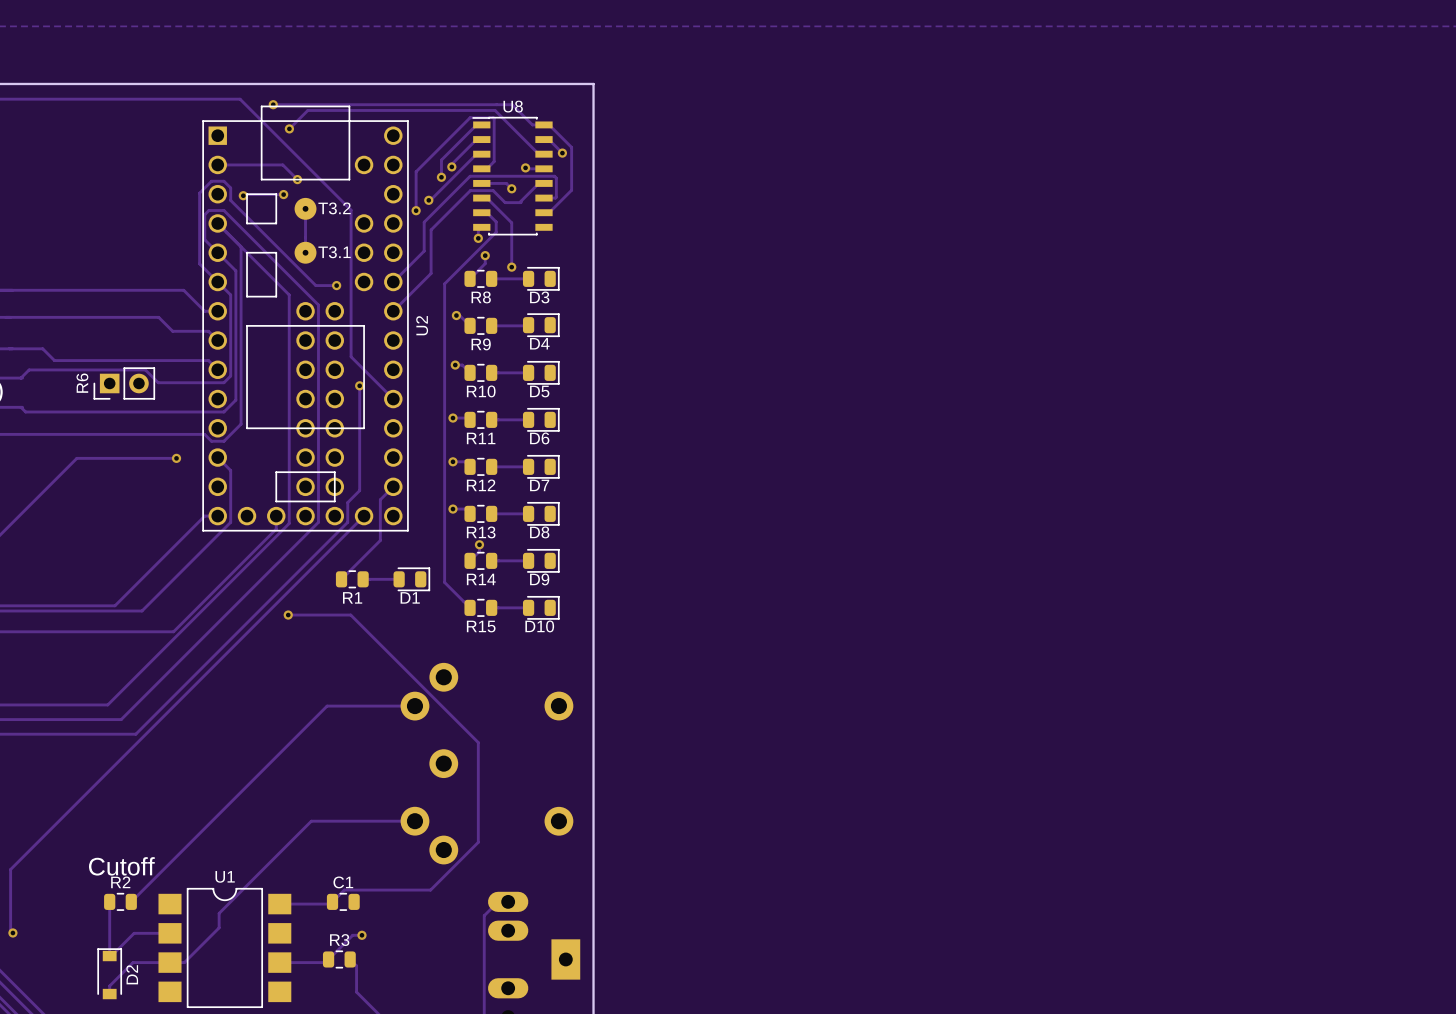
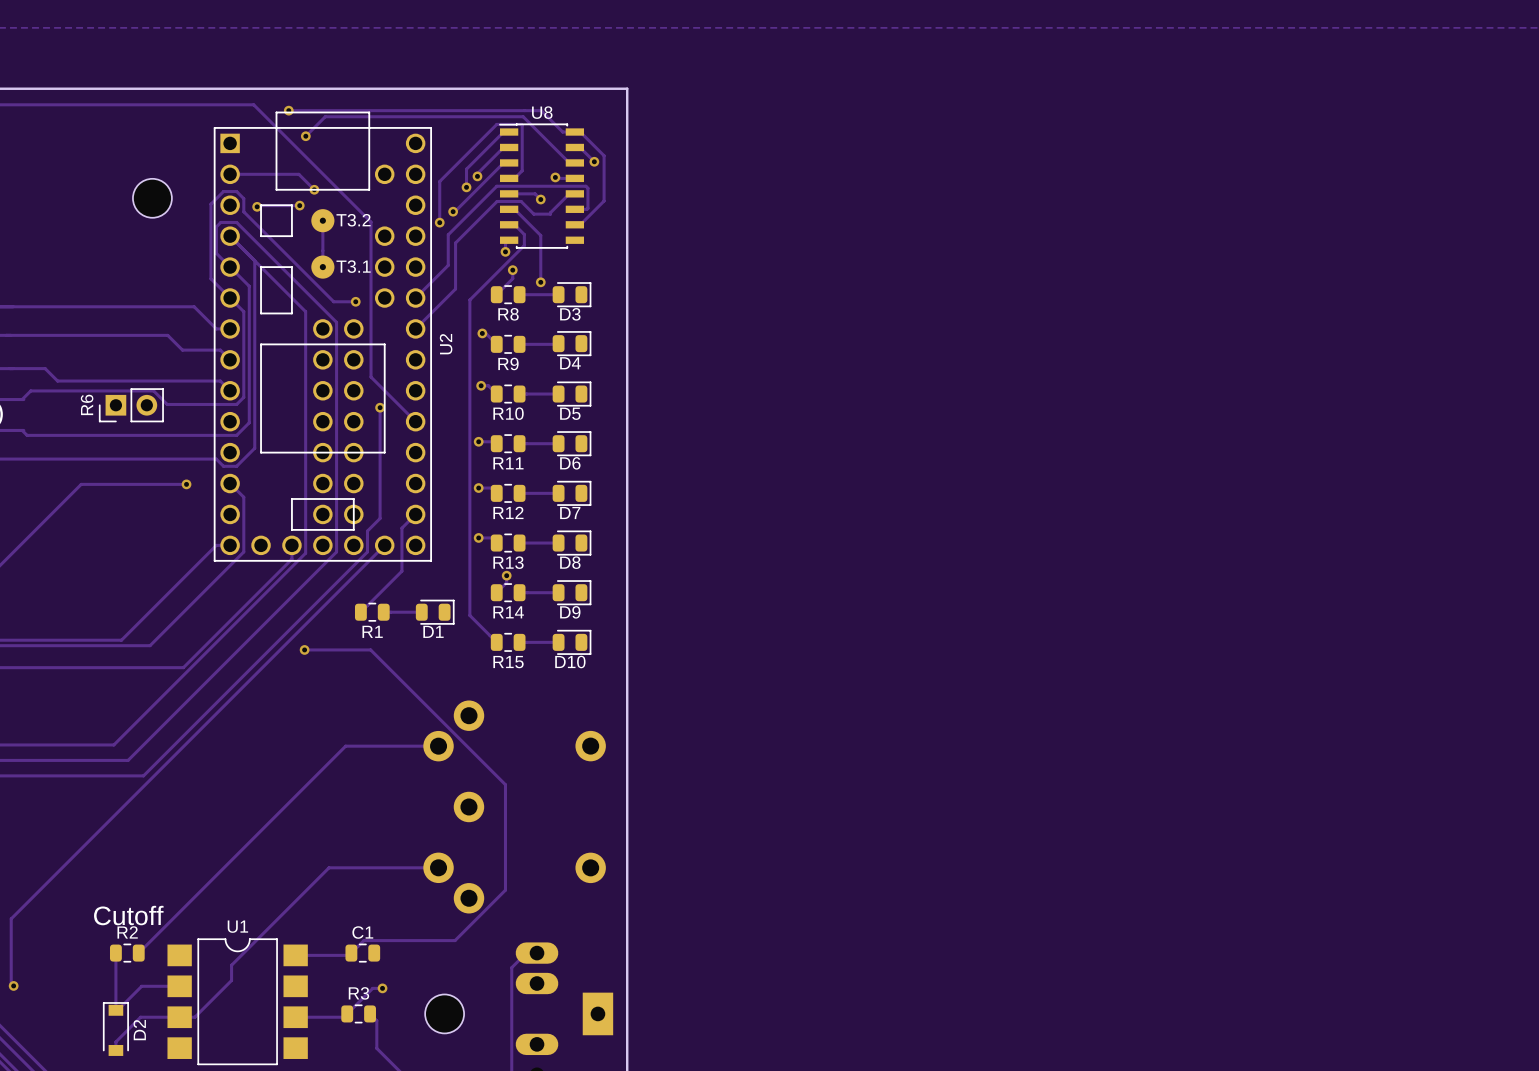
part: none -> (152, 198)
part: none -> (444, 1013)

